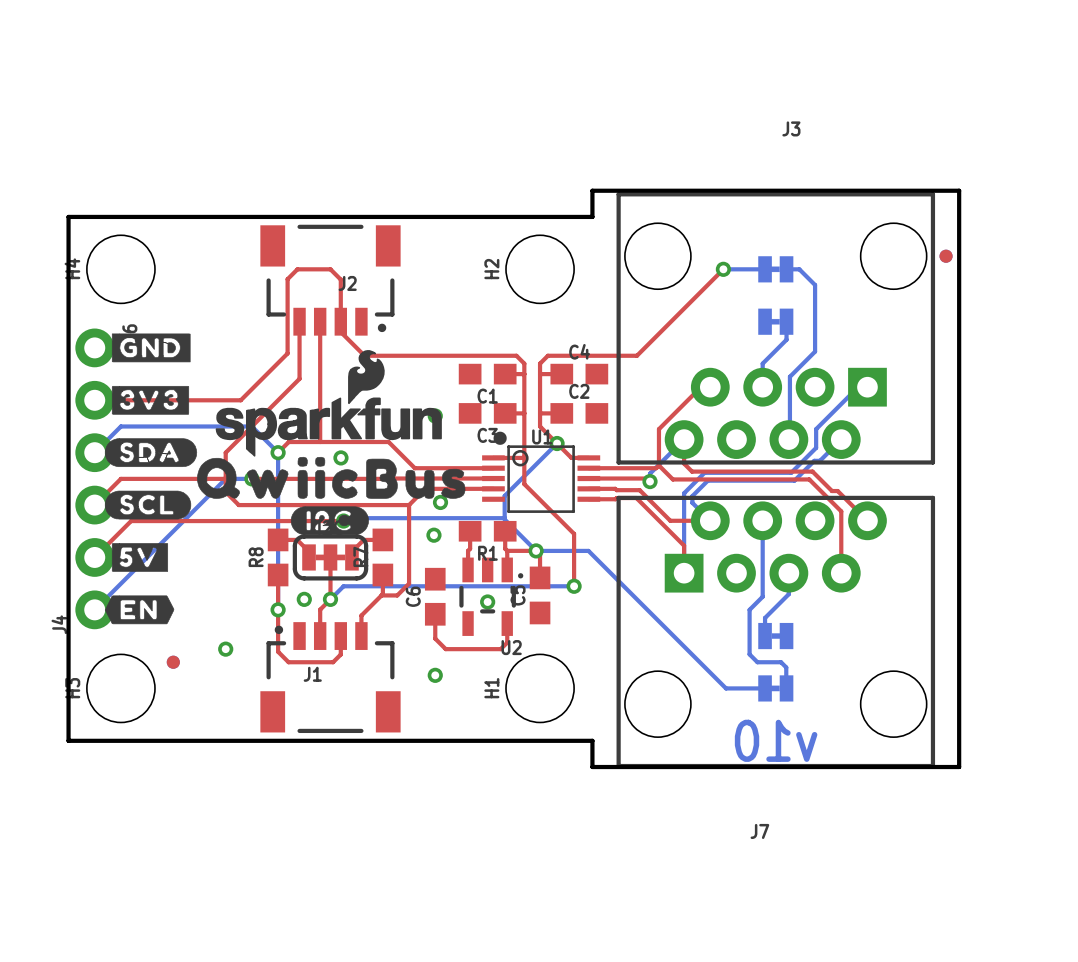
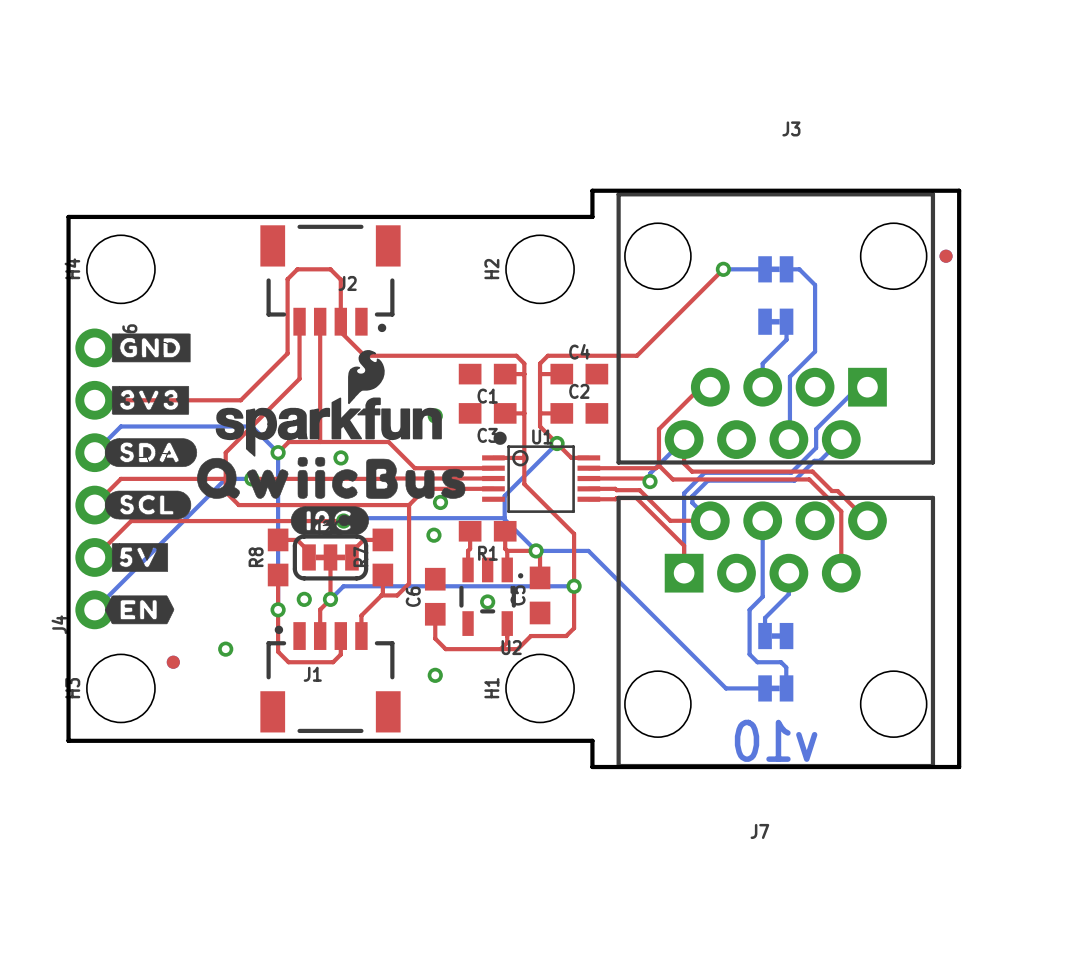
top track: none -> (574, 586) (574, 628) (566, 636) (530, 636) (517, 649) (500, 649)

